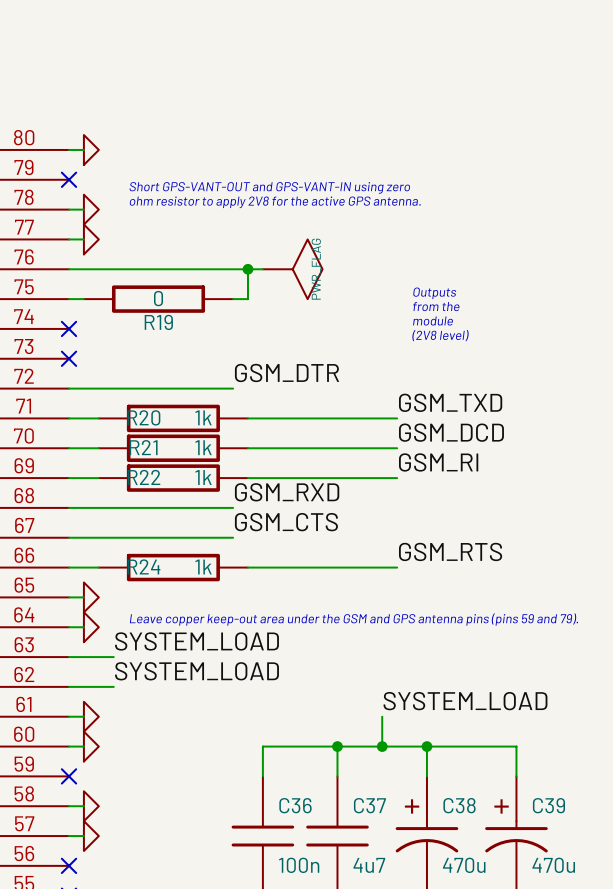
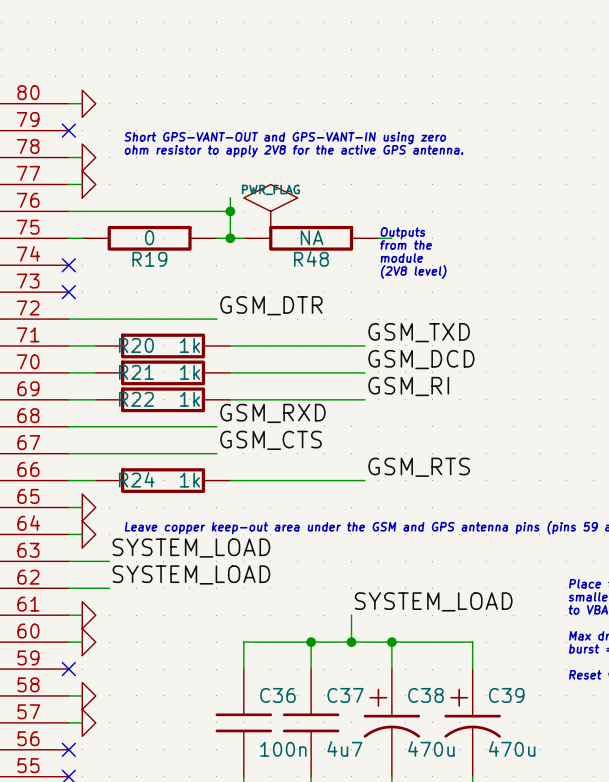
wire: (247, 269) (262, 269) -> (230, 211) (230, 197)
power symbol rotation: 0° (292, 269) -> 90° counterclockwise (270, 211)
wire: none -> (230, 238) (243, 238)
junction: none -> (230, 238)
R48: none -> NA (311, 238)
wire: none -> (378, 238) (391, 238)

